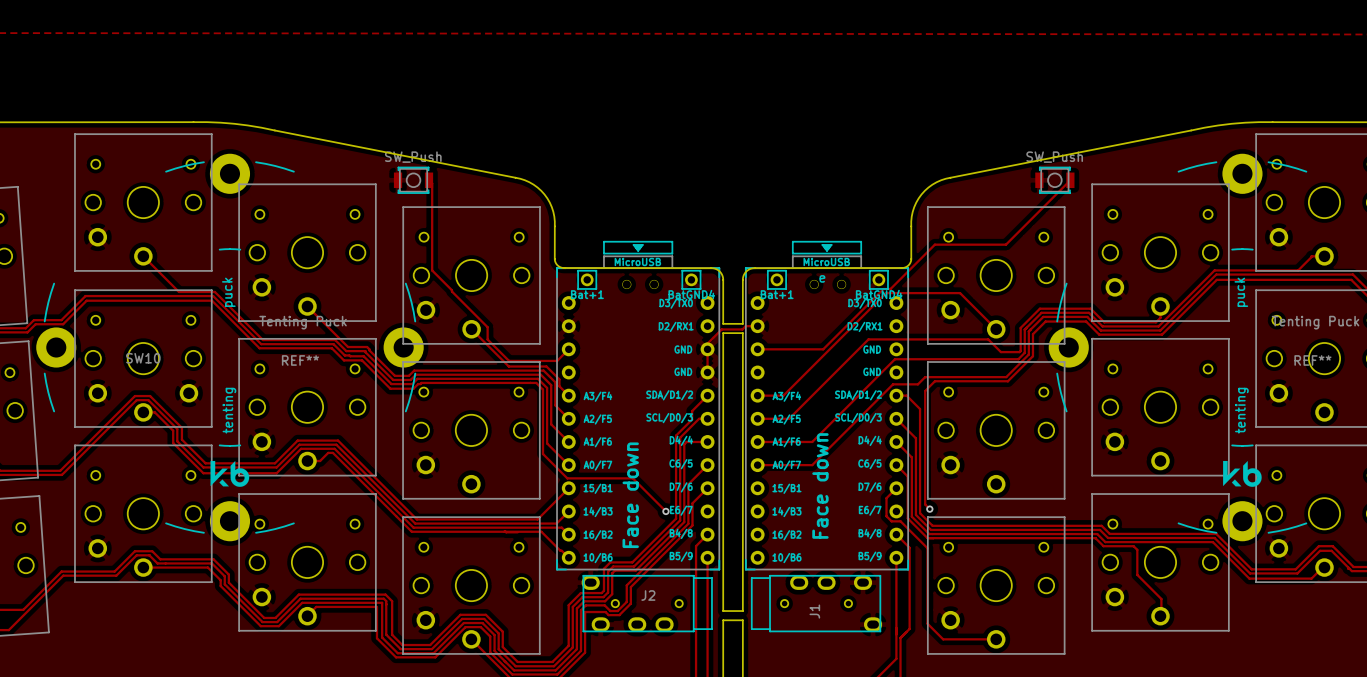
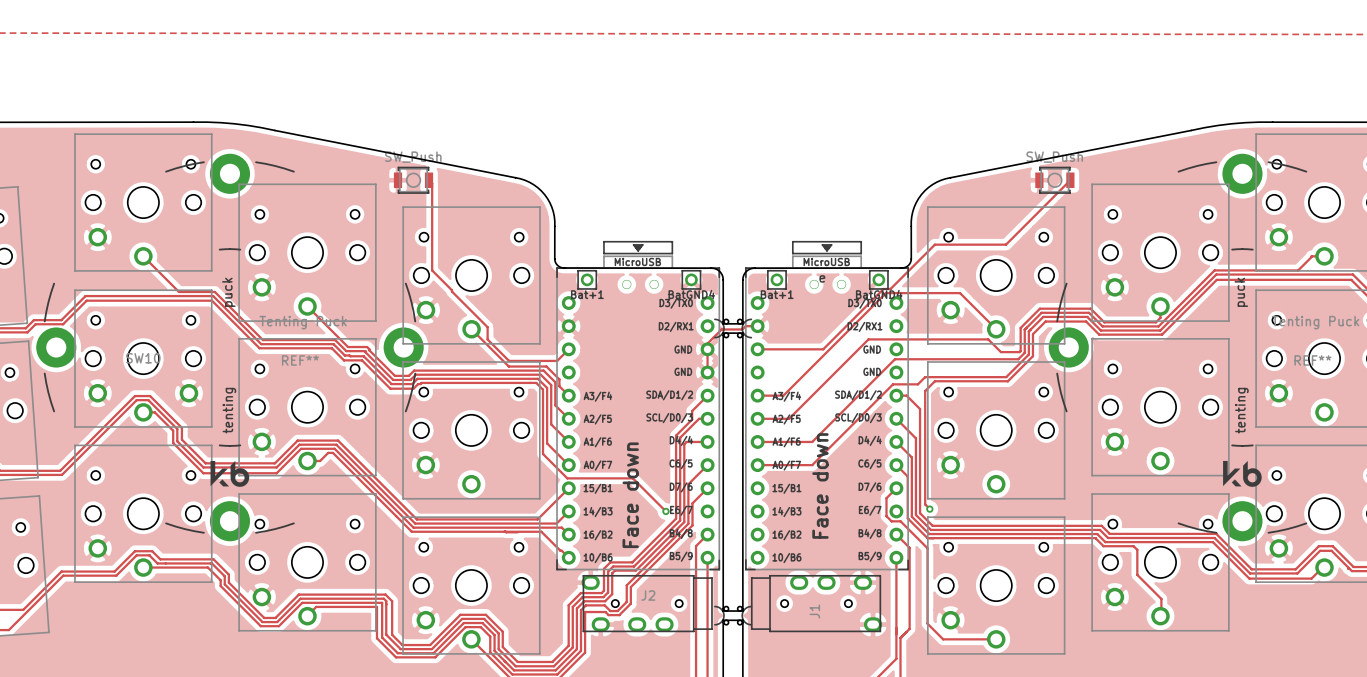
part: none -> (733, 328)
part: none -> (733, 615)

